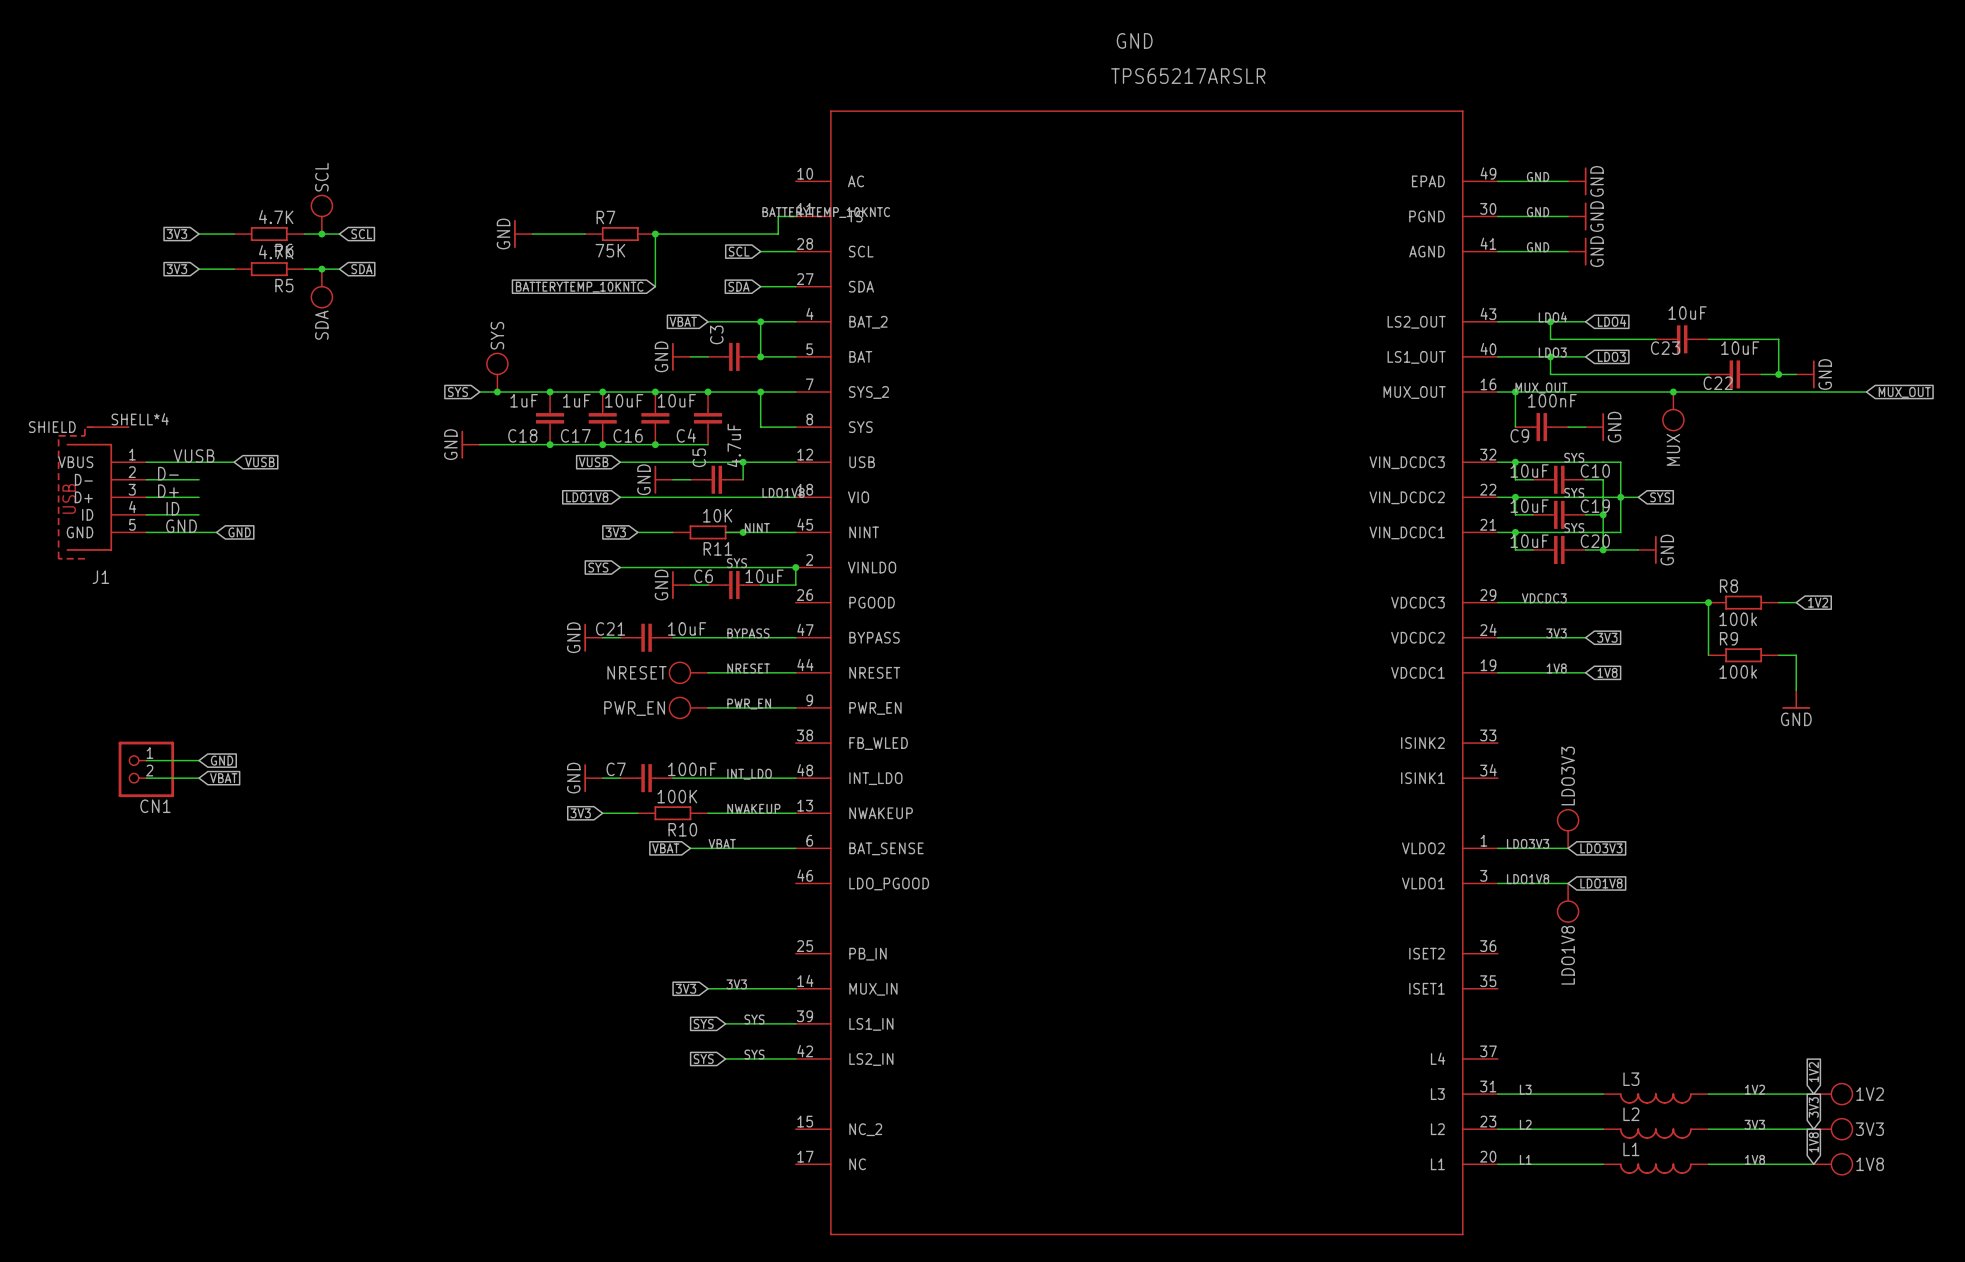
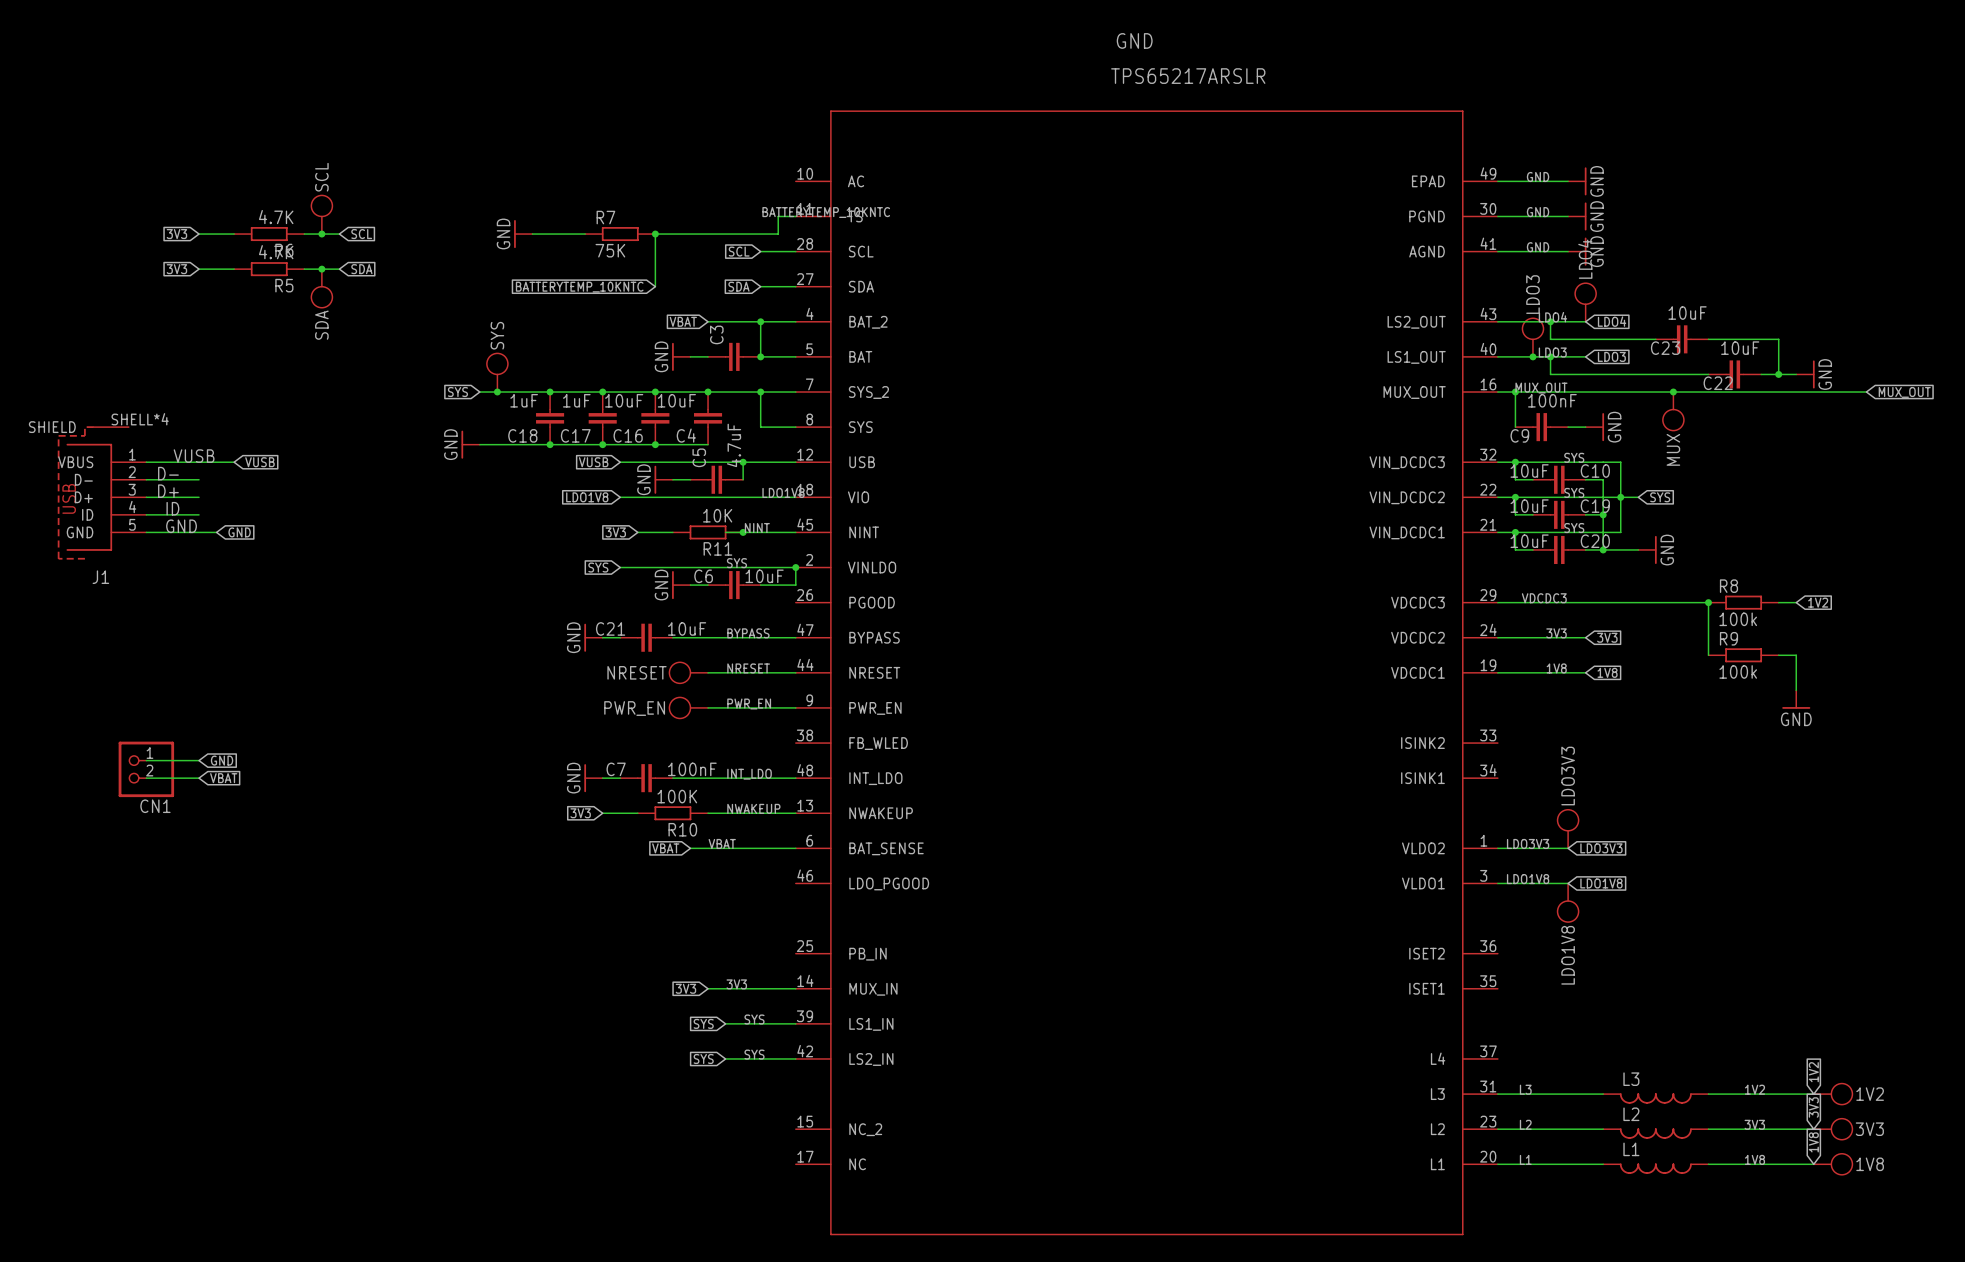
LDO4: none -> (1585, 302)
LDO3: none -> (1532, 337)
junction: none -> (1532, 356)

